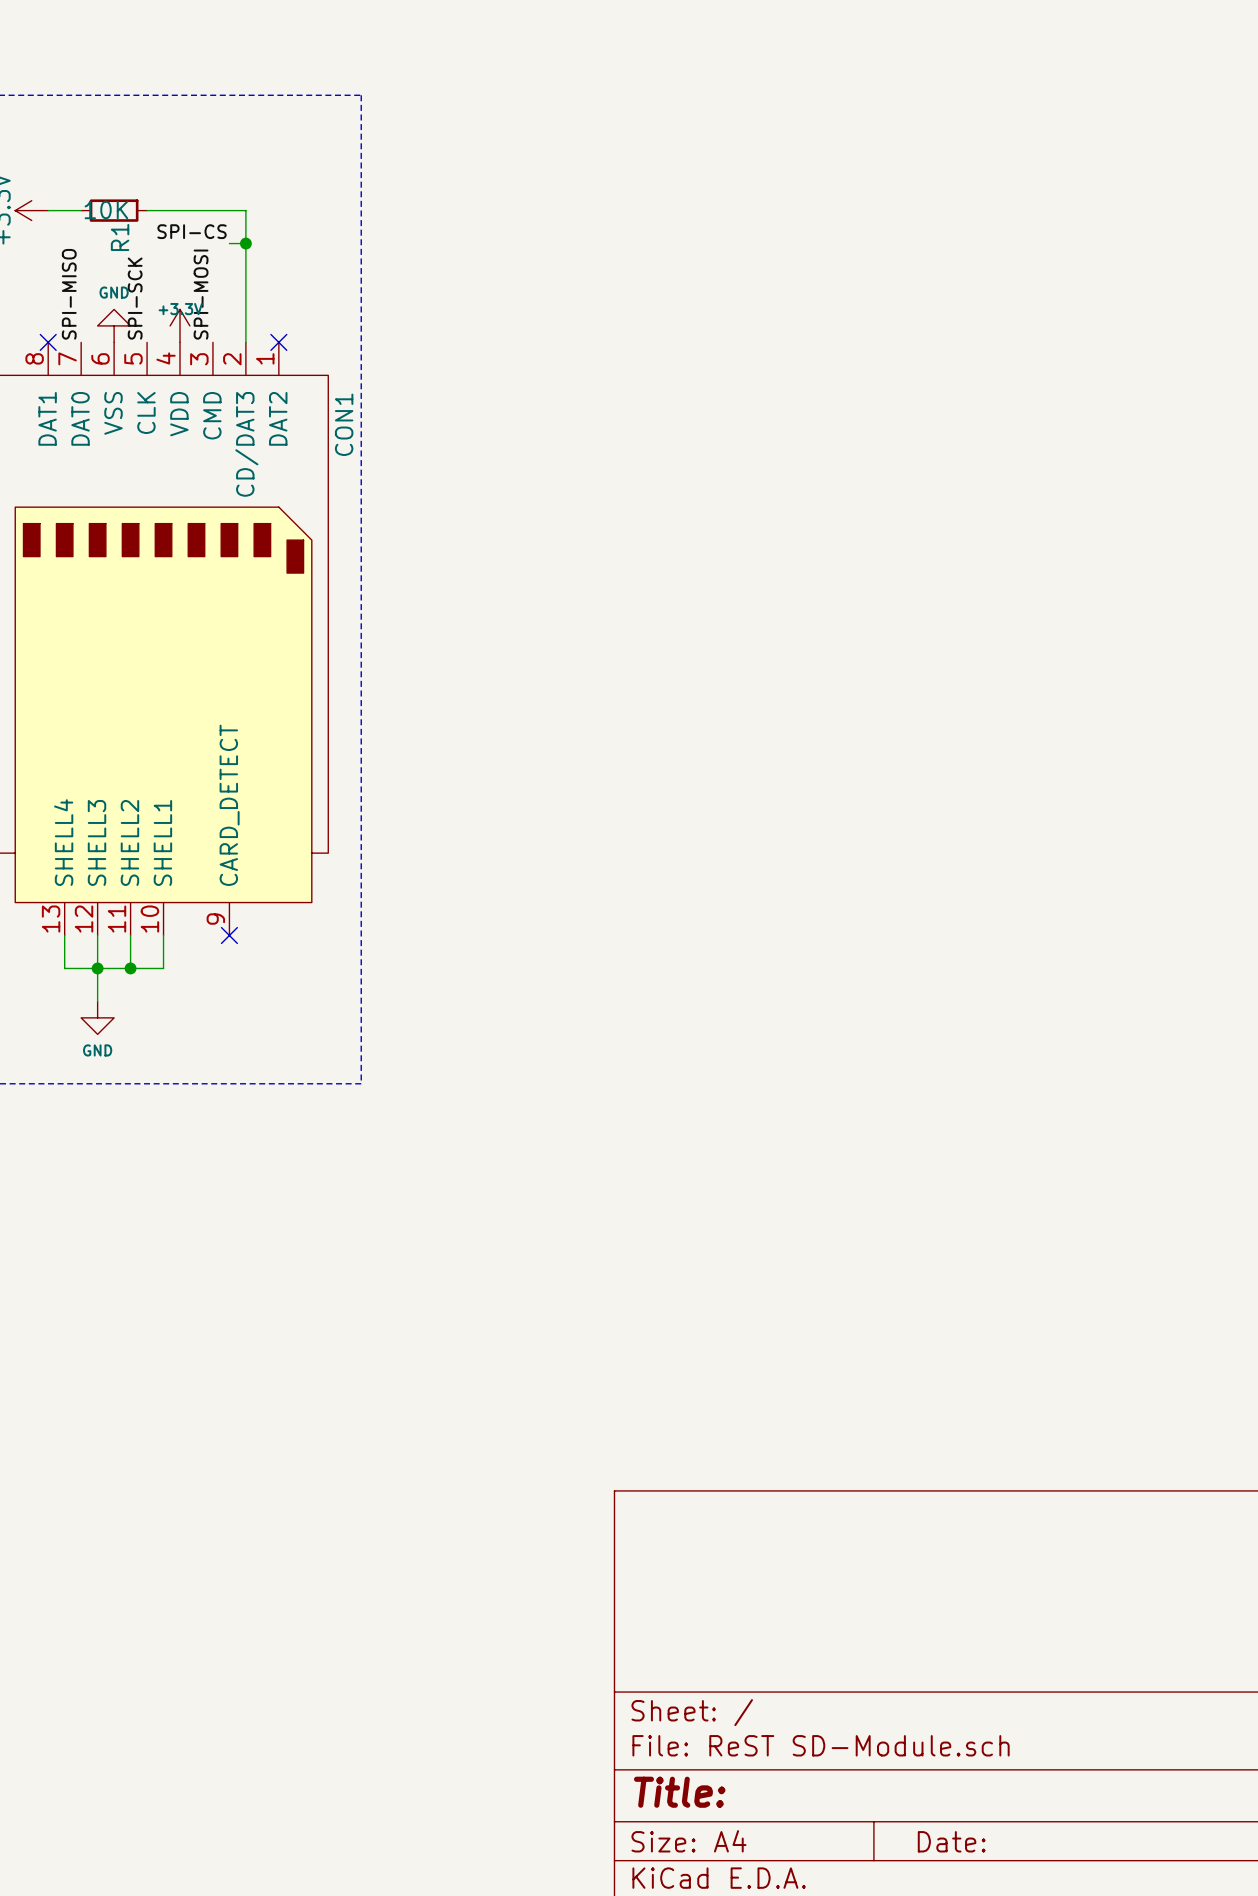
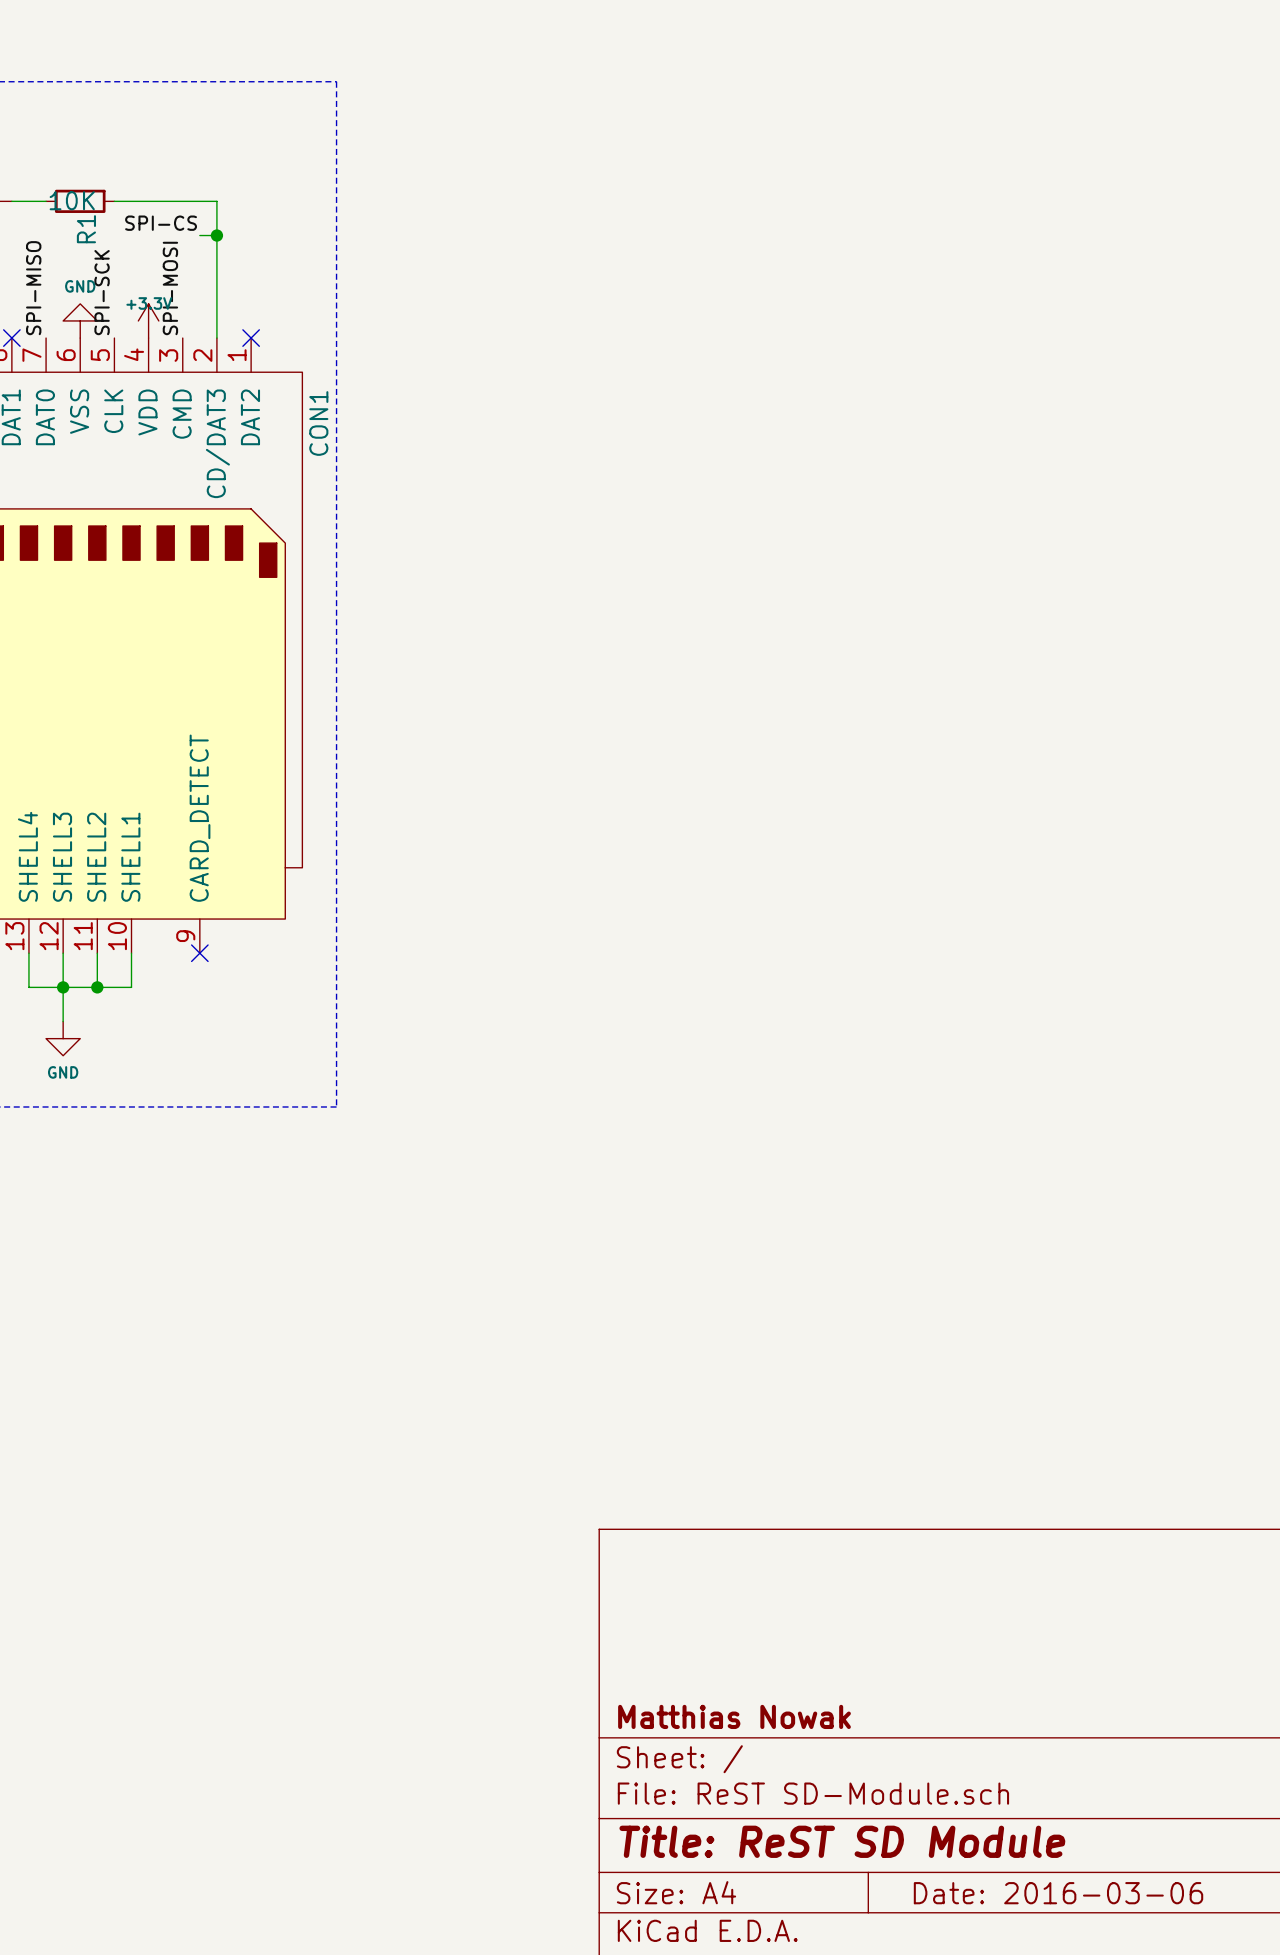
title block: none -> Matthias Nowak (734, 1716)
title block: Title: (679, 1792) -> Title: ReST SD Module (842, 1841)
title block: Date: (951, 1841) -> Date: 2016-03-06 (1058, 1893)

